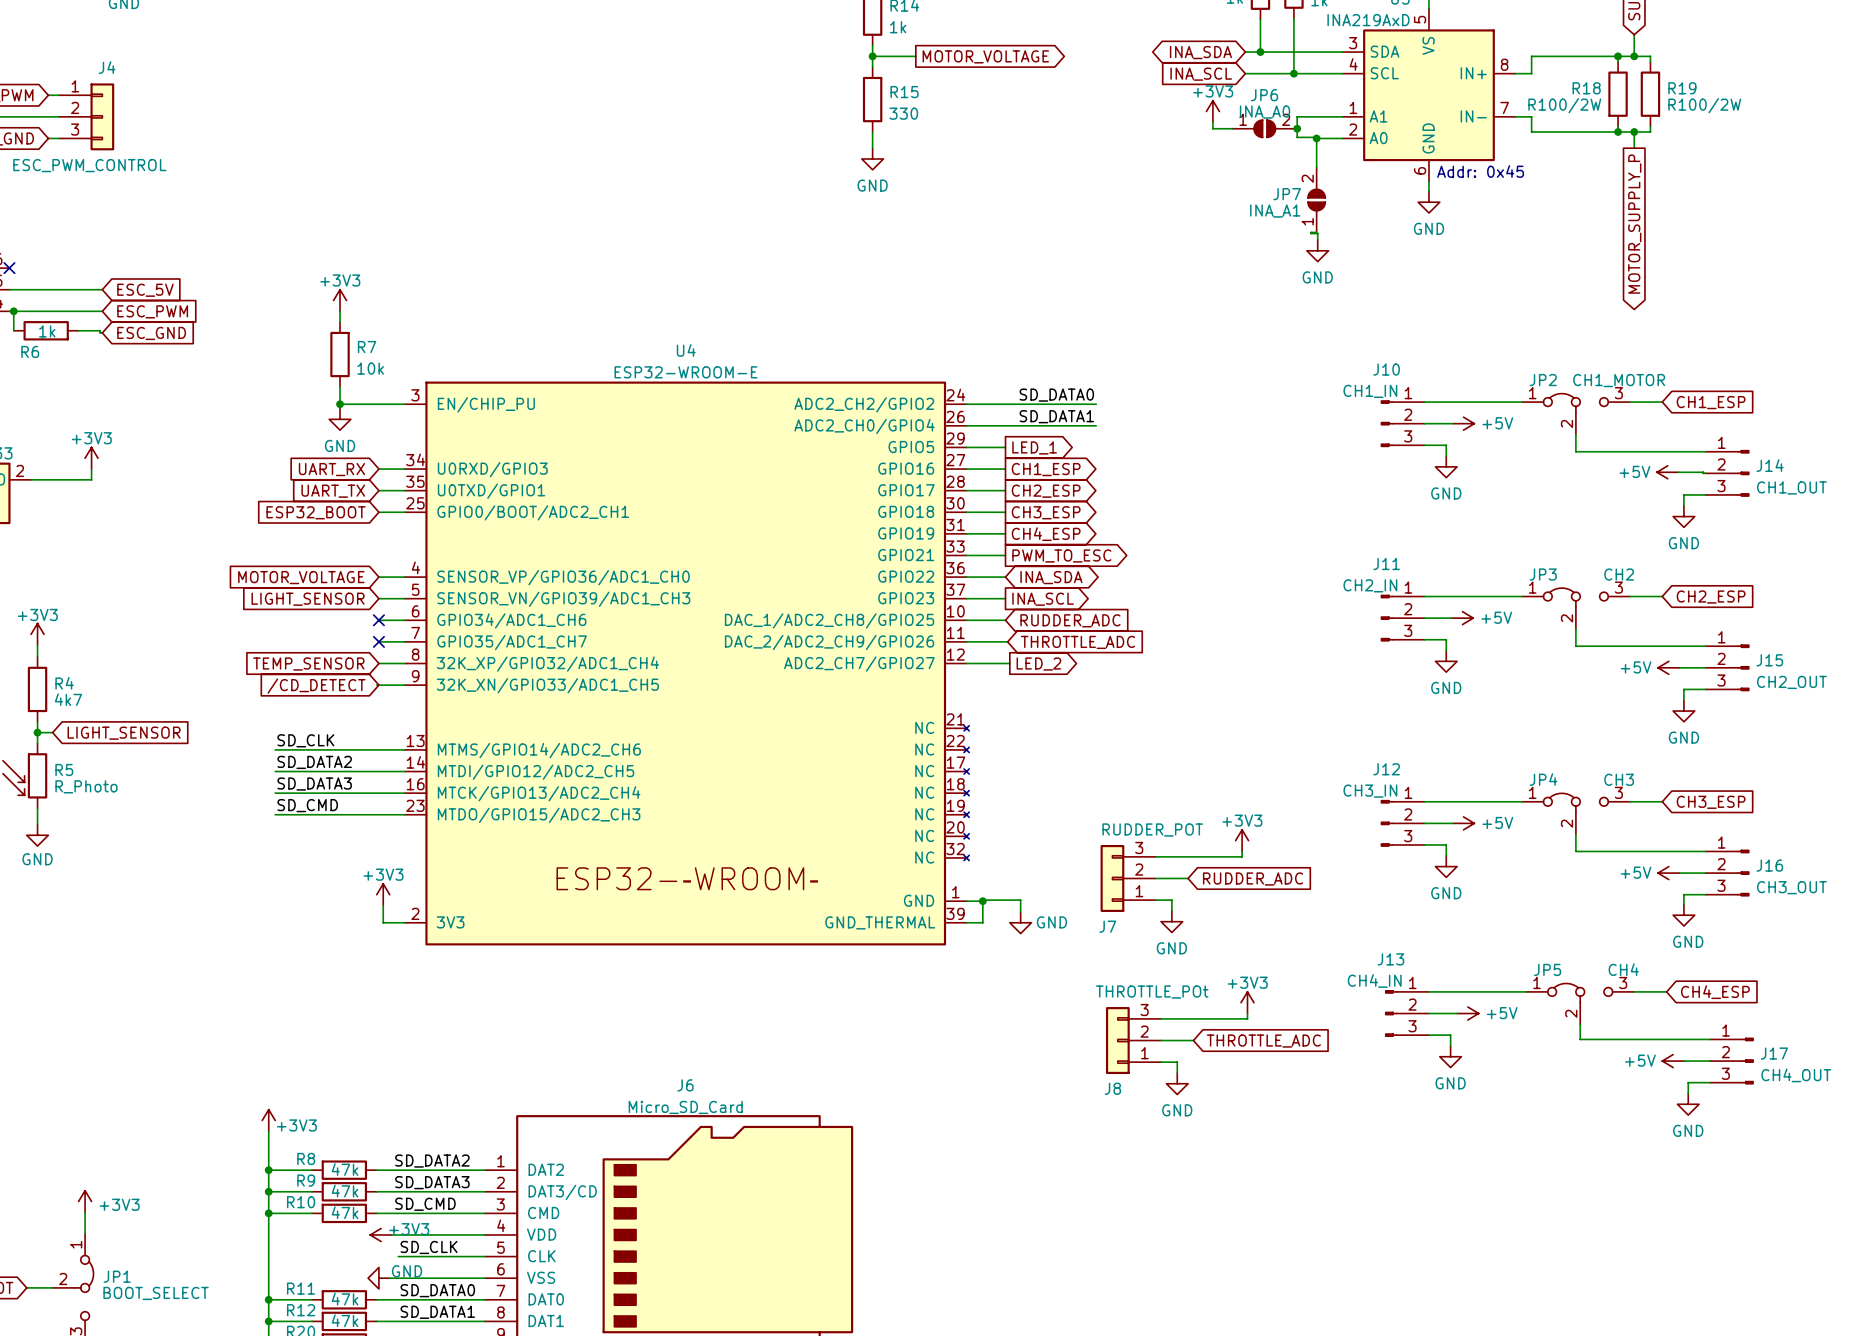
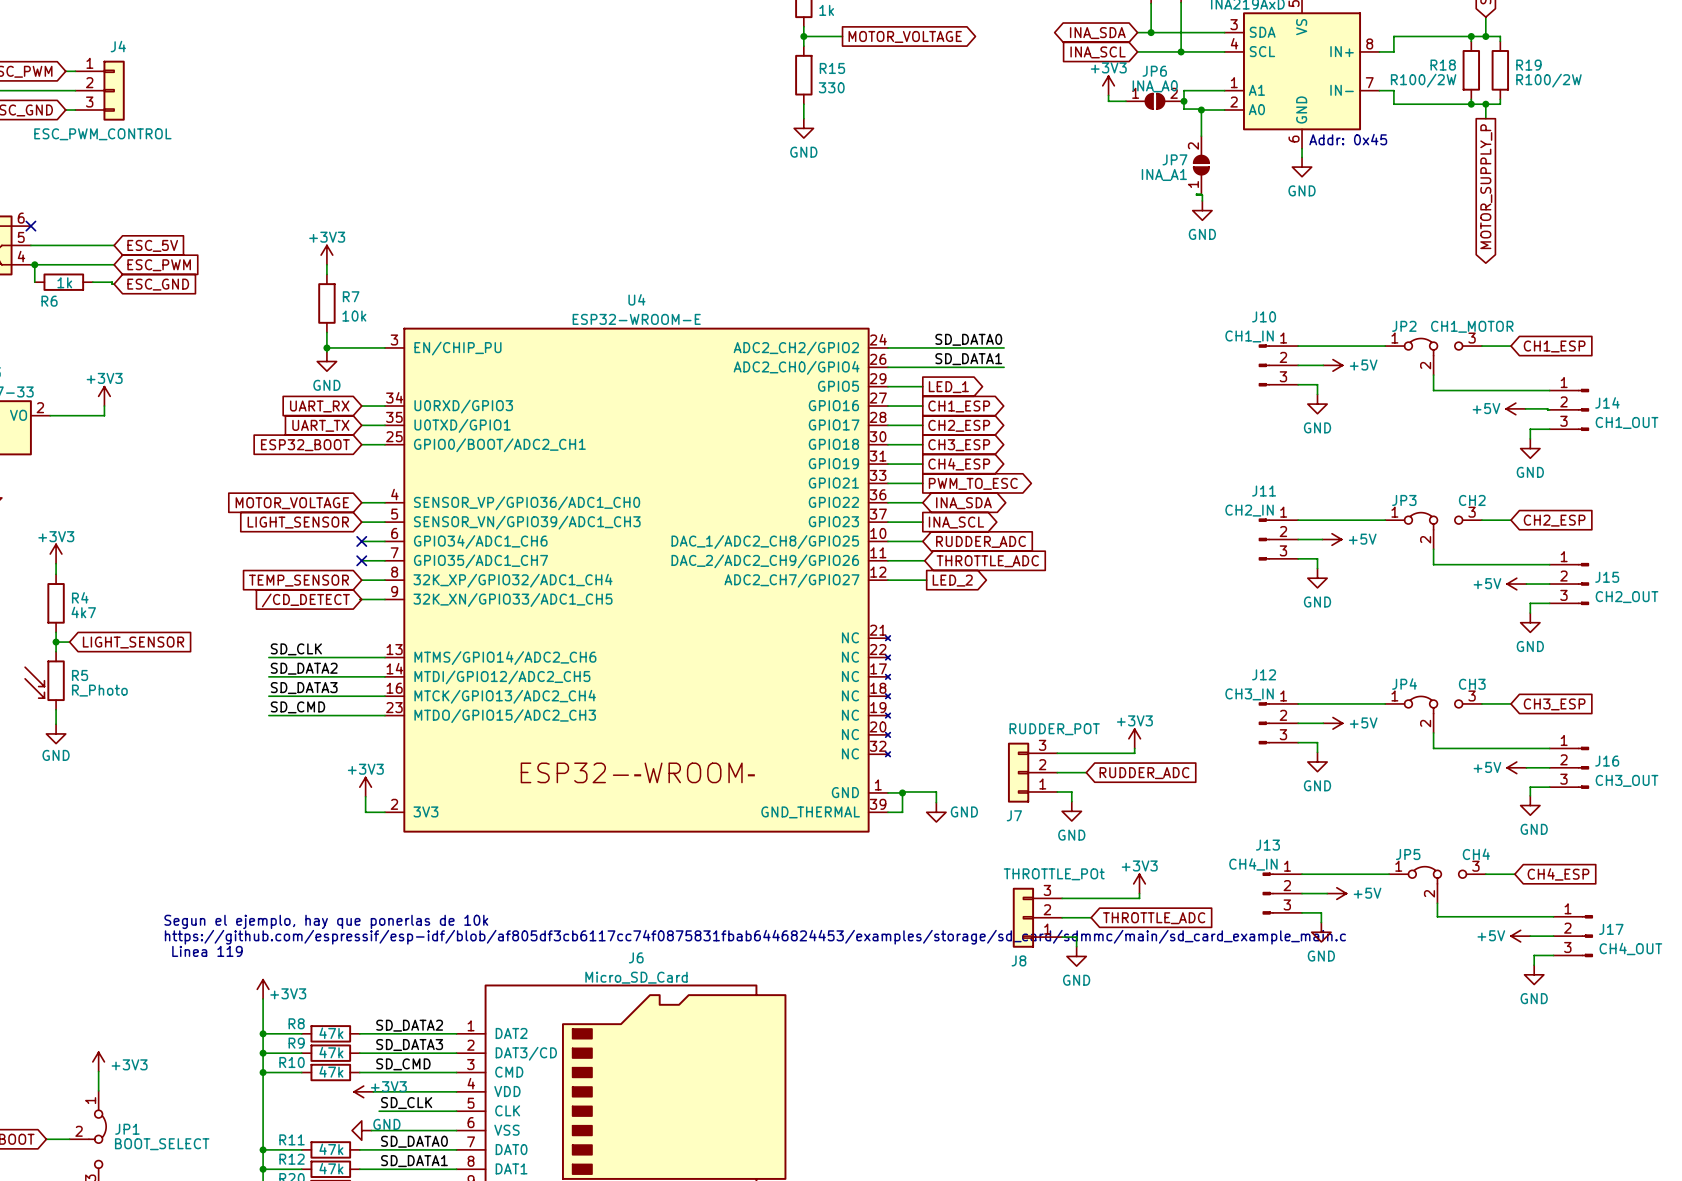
text: none -> Segun el ejemplo, hay que ponerlas de 10k (326, 921)
text: none -> https://github.com/espressif/esp-idf/blob/af805df3cb6117cc74f0875831fbab6446824453/examples/storage/sd_card/sdmmc/main/sd_card_example_main.c (755, 937)
text: none -> Linea 119 (207, 951)

